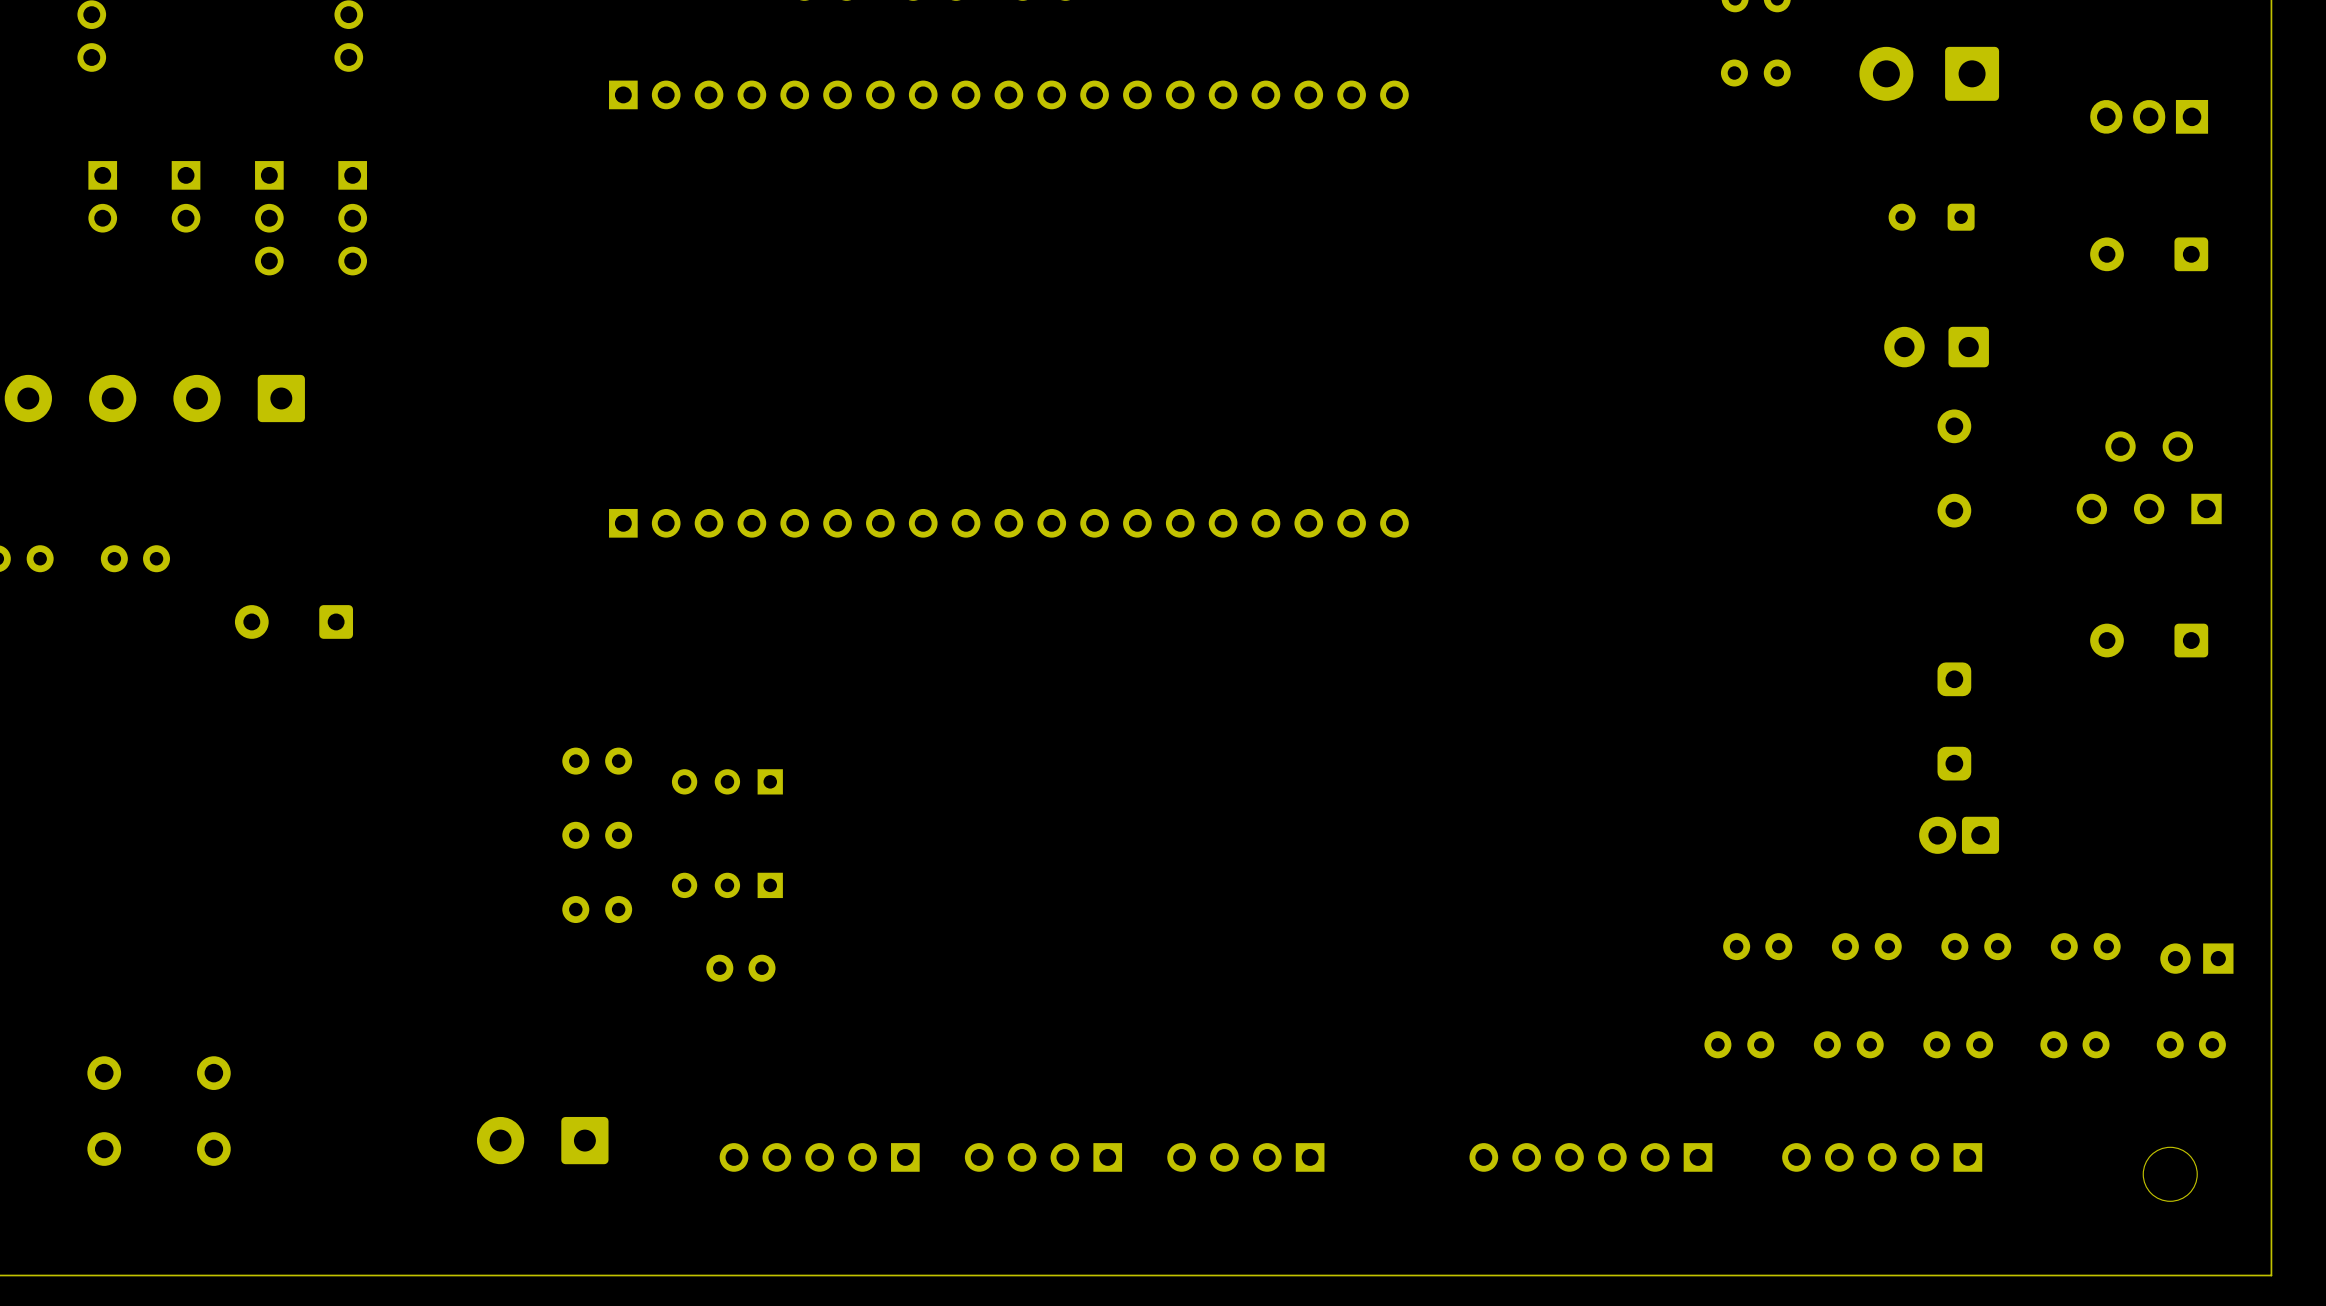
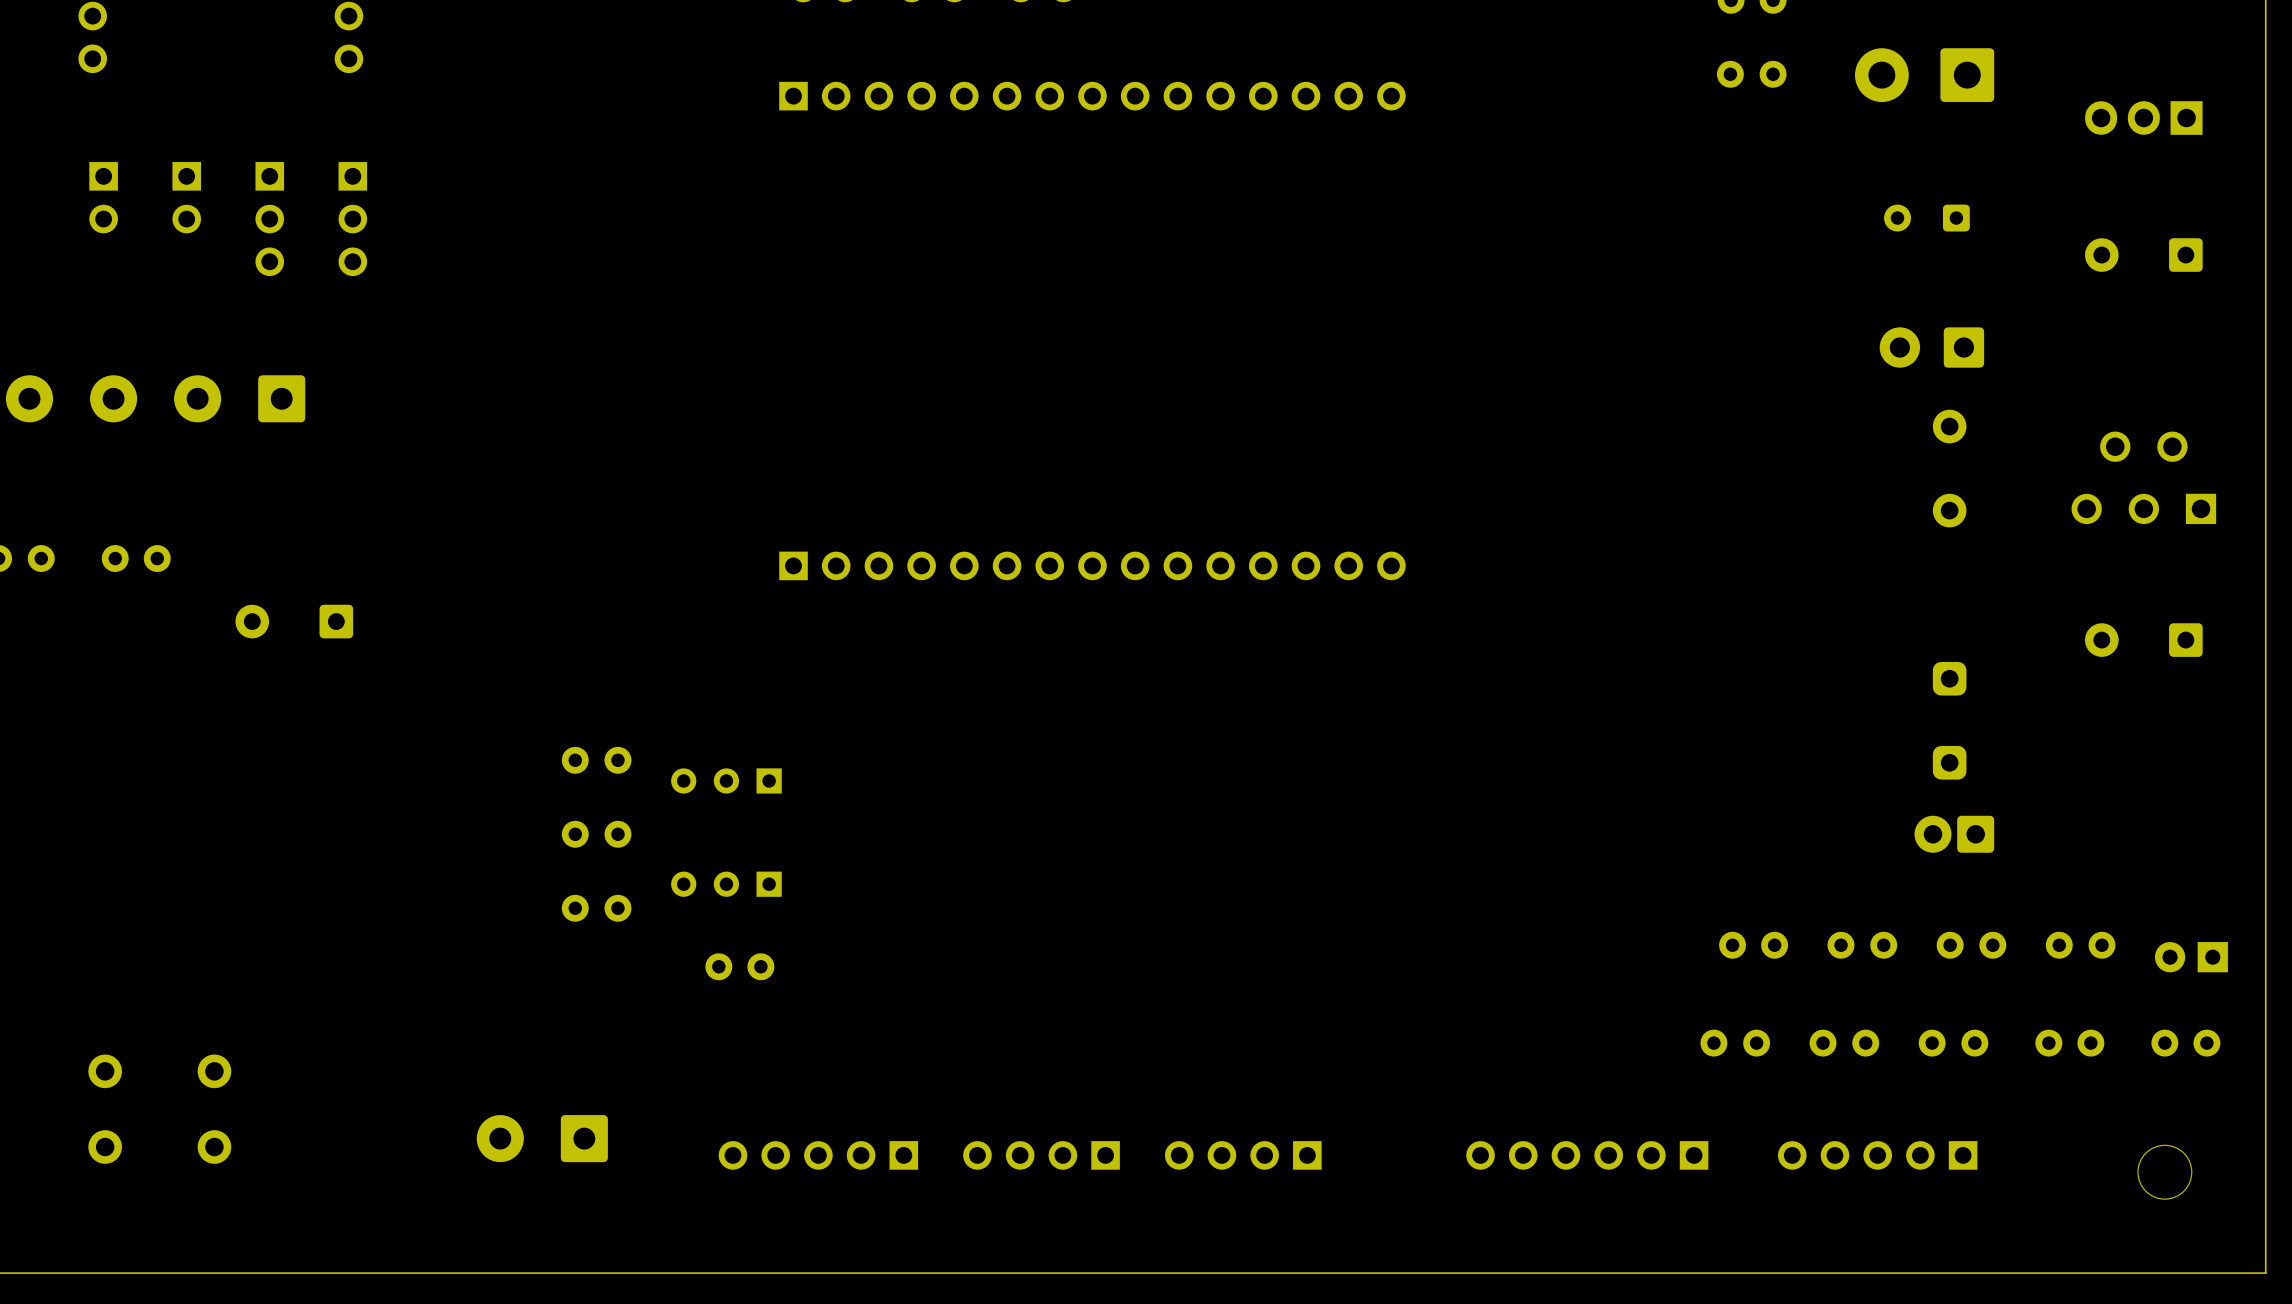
part: (1008, 94) -> none
part: none -> (1092, 96)
part: (1008, 523) -> none
part: none -> (1092, 565)

